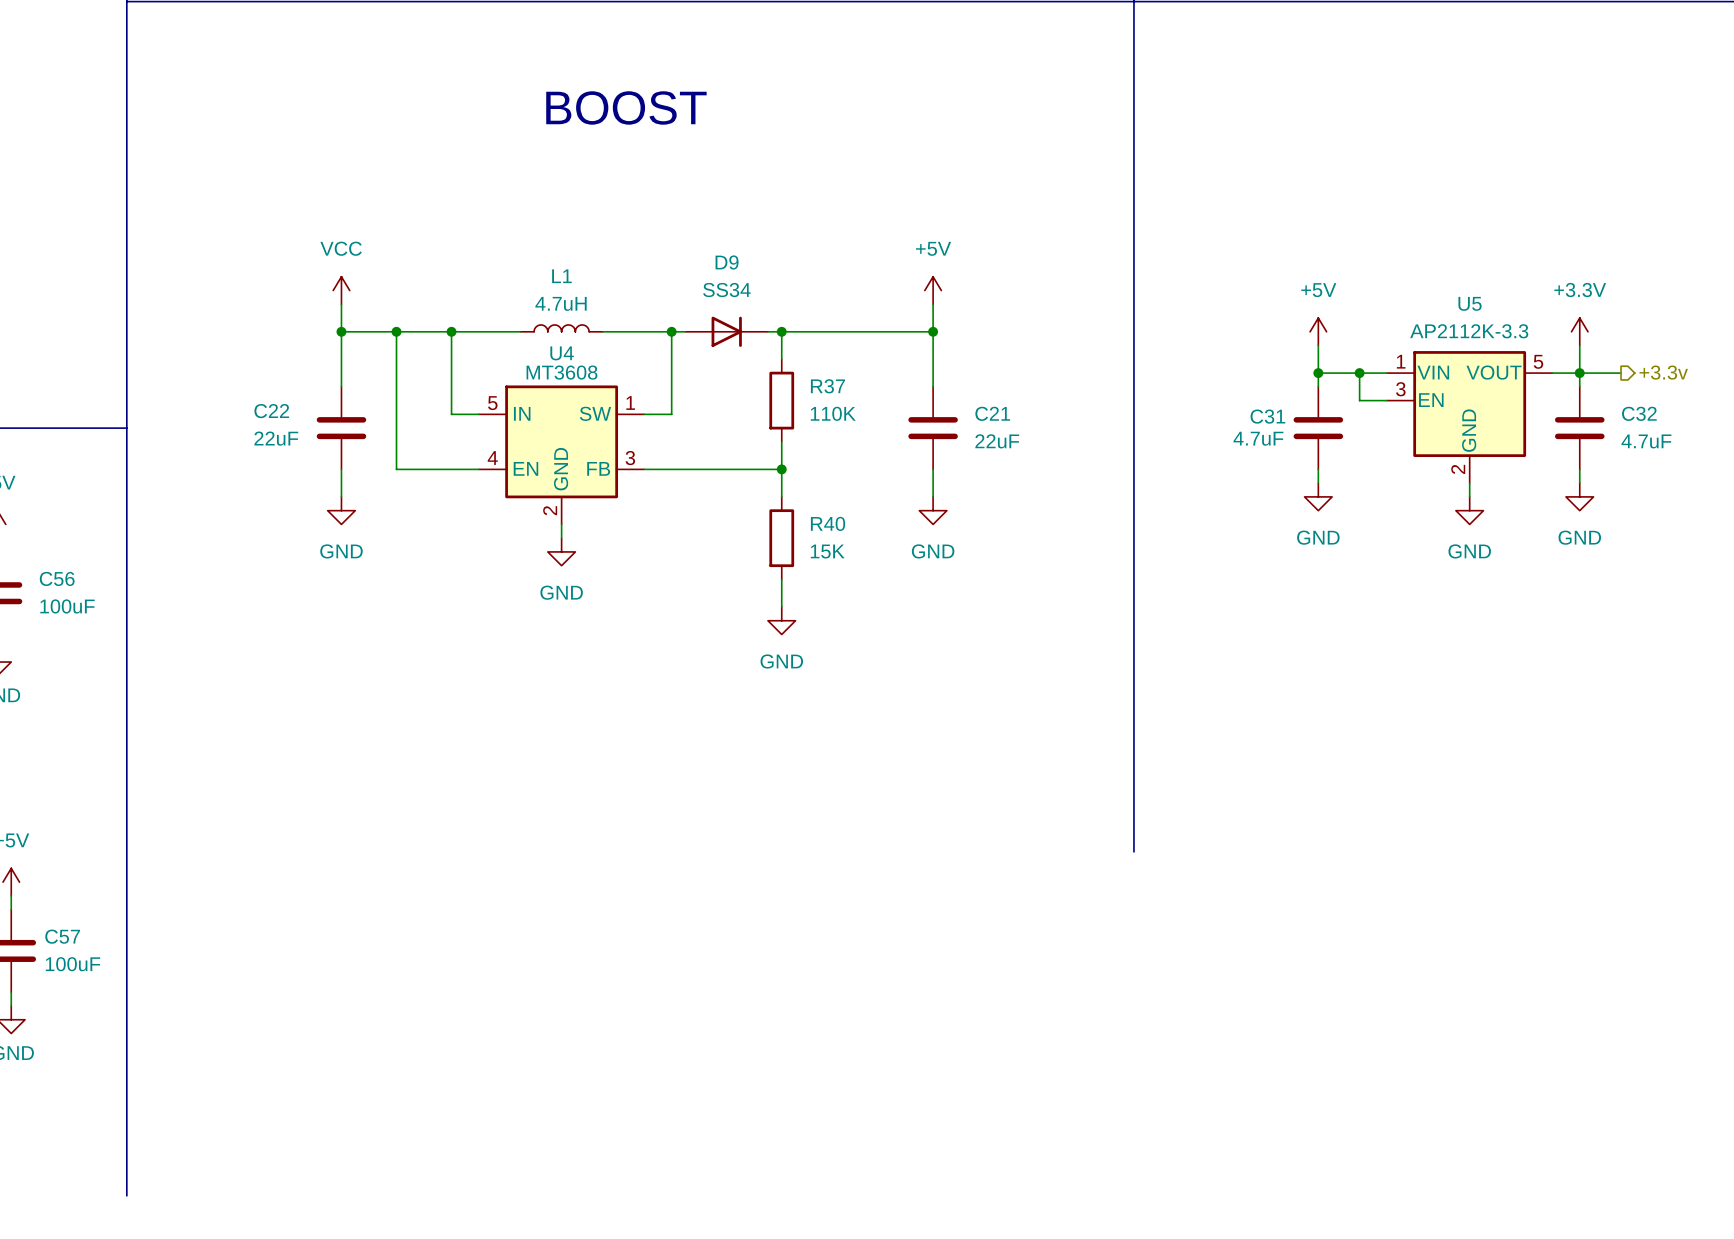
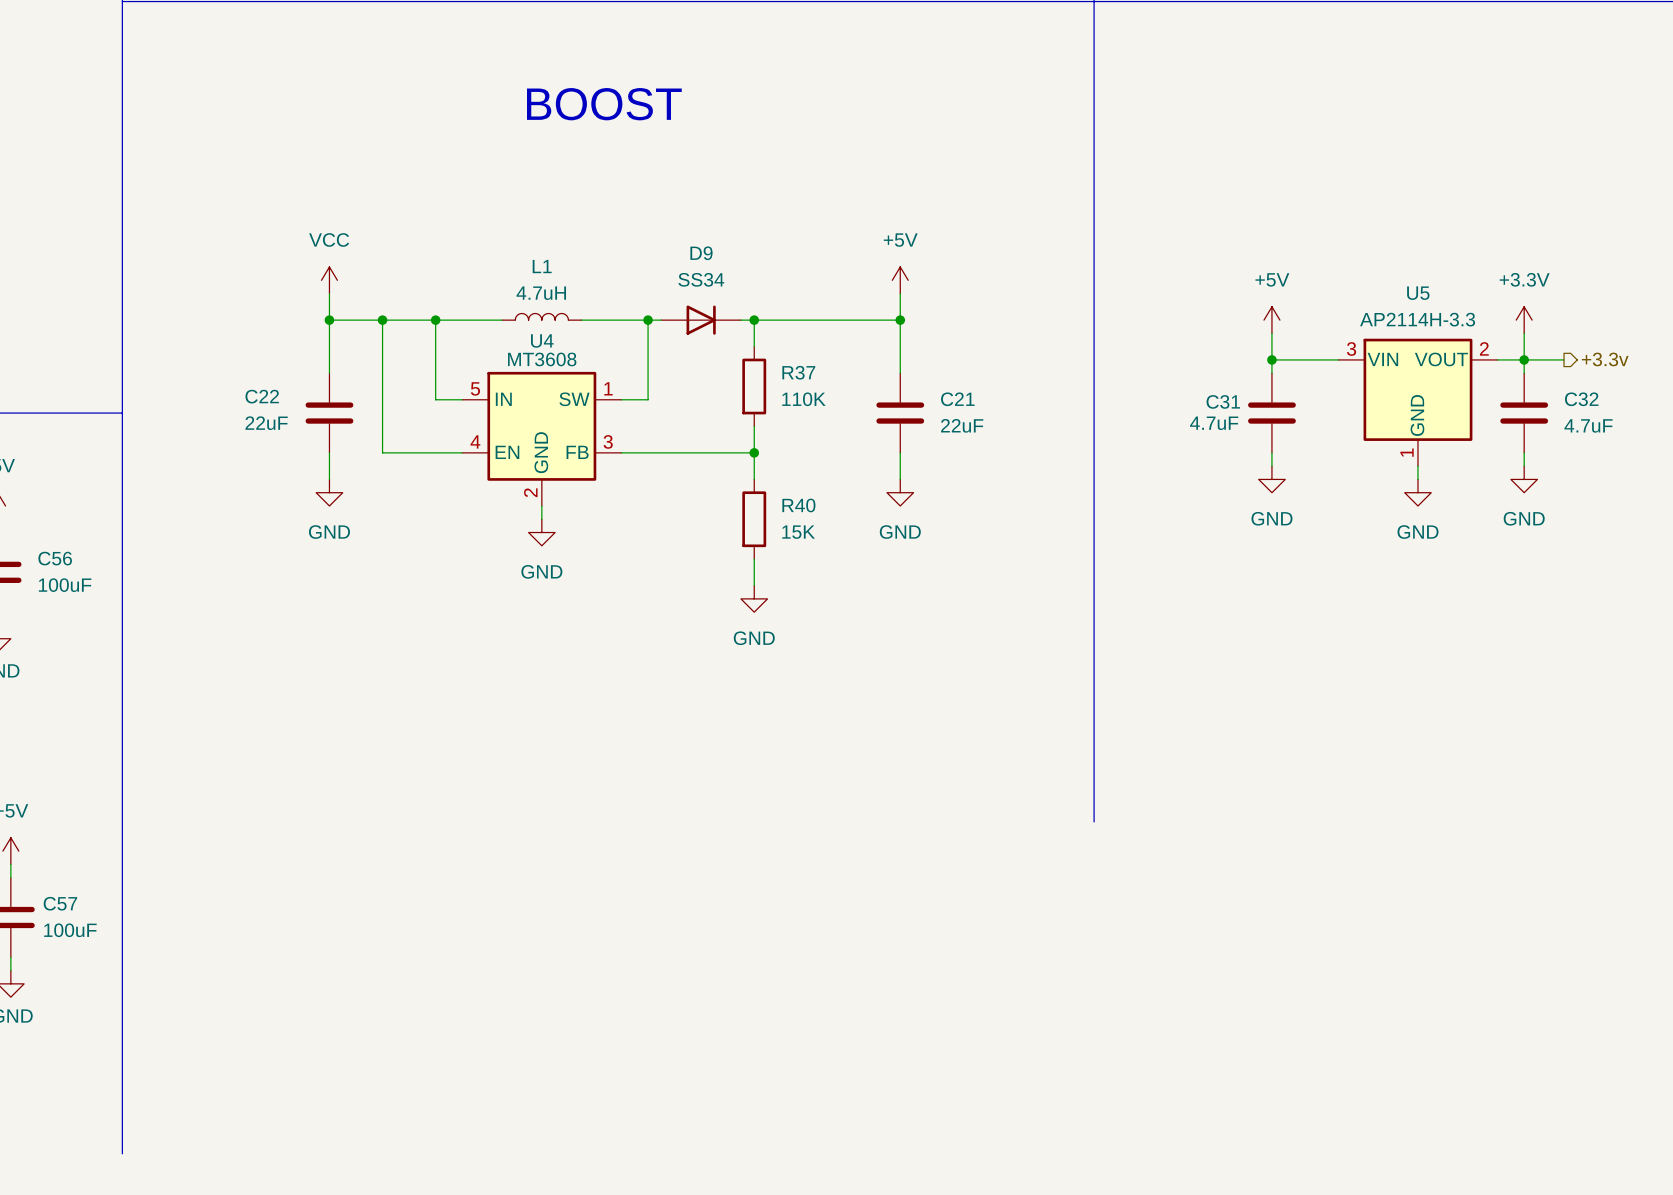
U5 value: AP2112K-3.3 (1469, 331) -> AP2114H-3.3 (1417, 319)
U5 symbol: [1387, 351, 1553, 484] -> [1338, 338, 1498, 467]
wire: (1359, 373) (1359, 400) (1387, 400) -> none
junction: (1359, 373) -> none

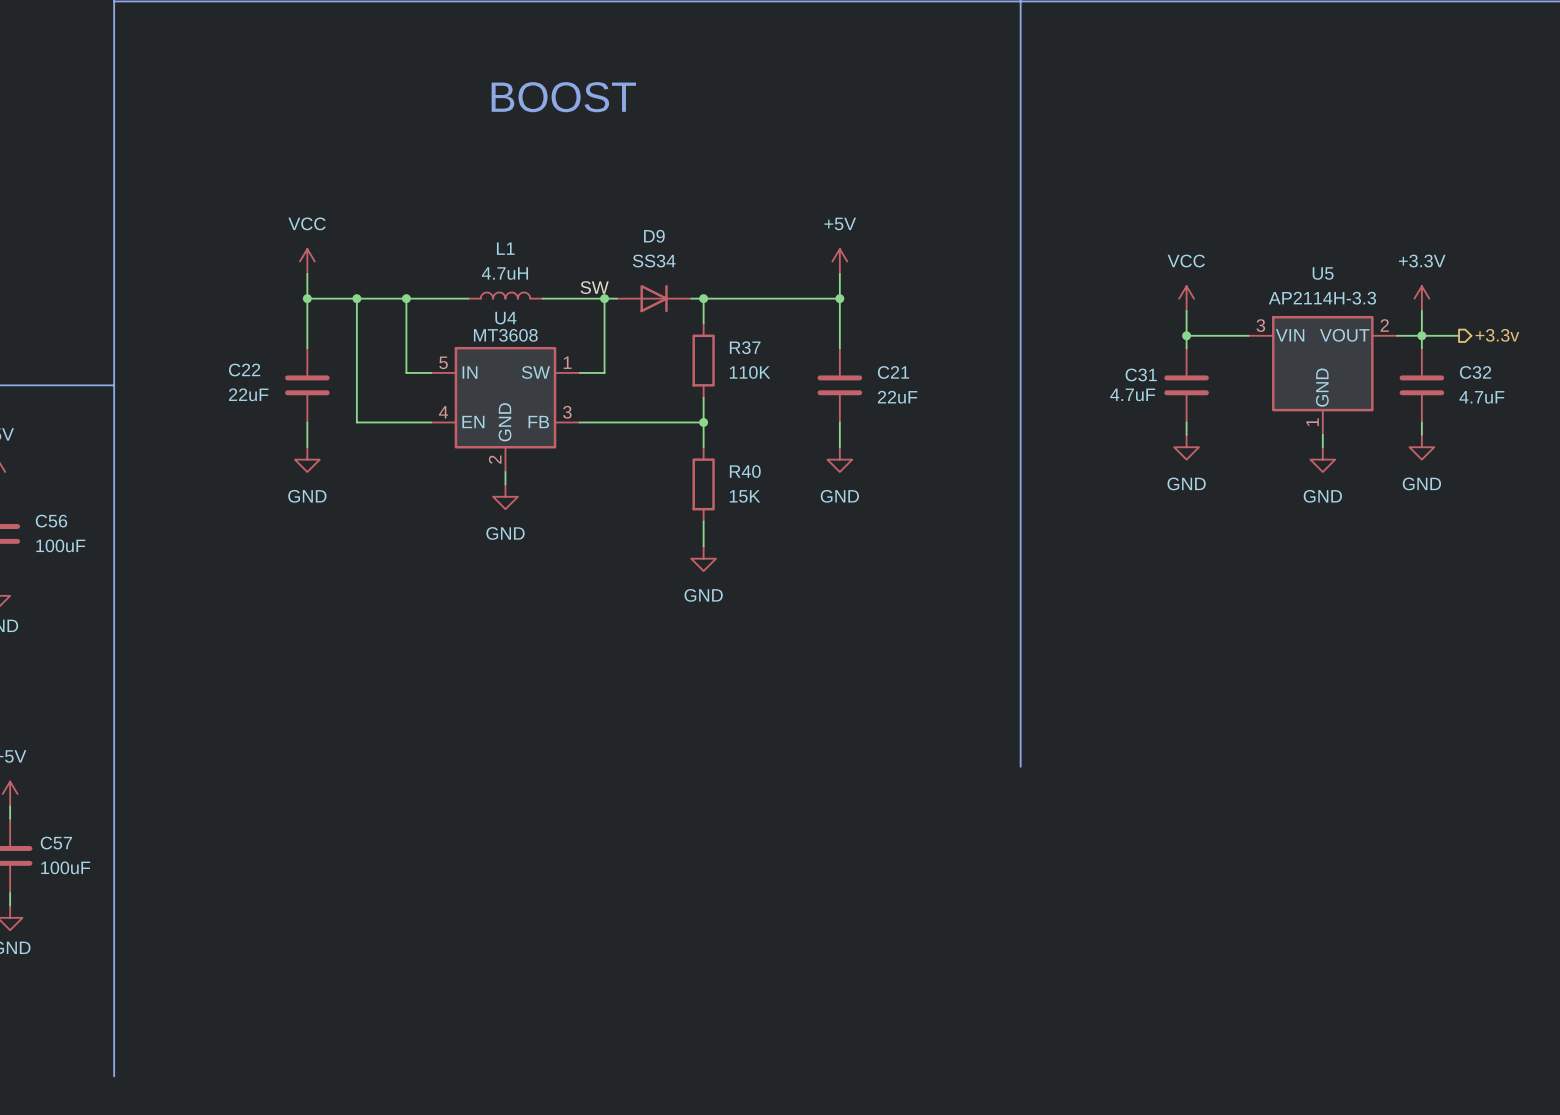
label: none -> SW (594, 287)
power symbol: +5V (1271, 320) -> VCC (1186, 298)

